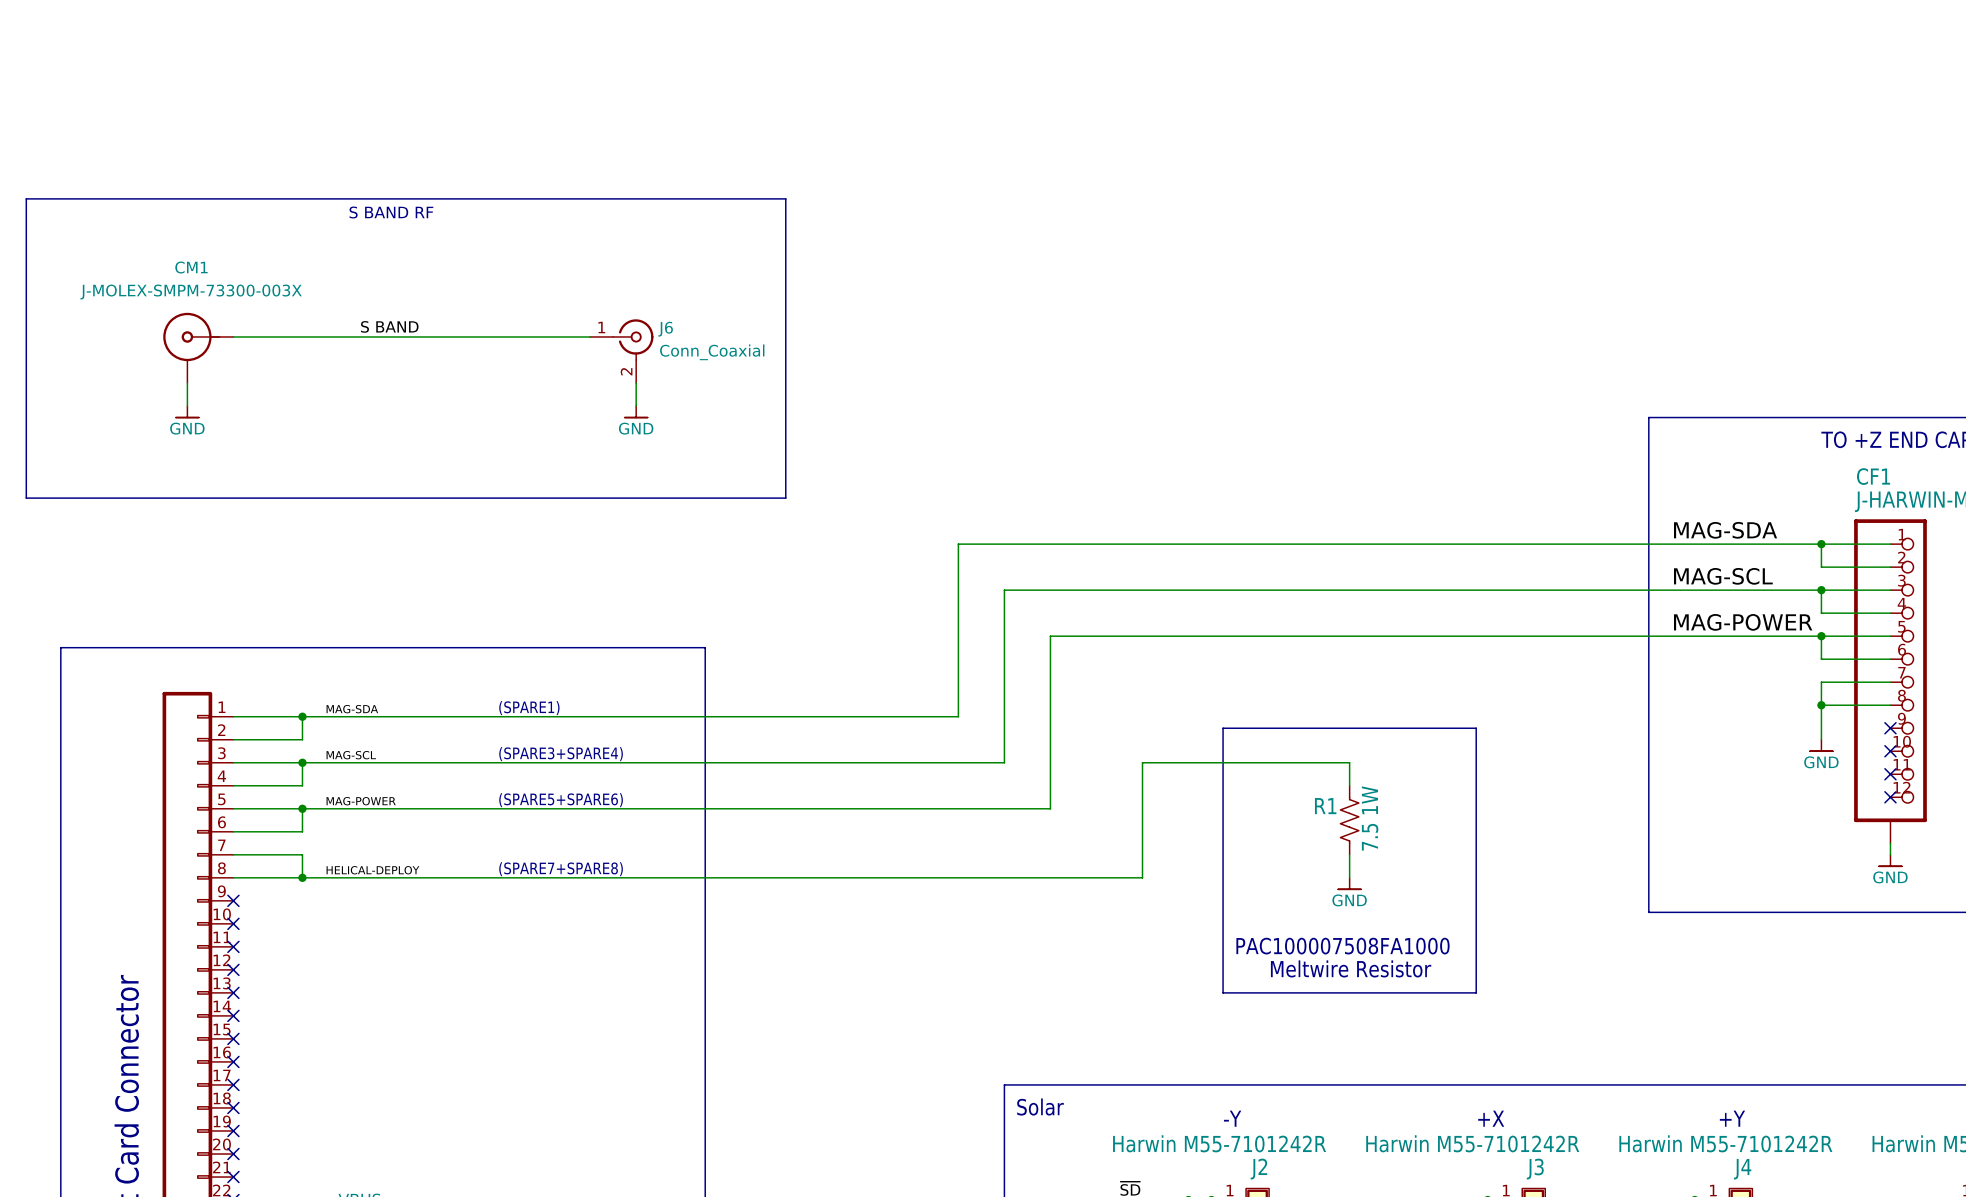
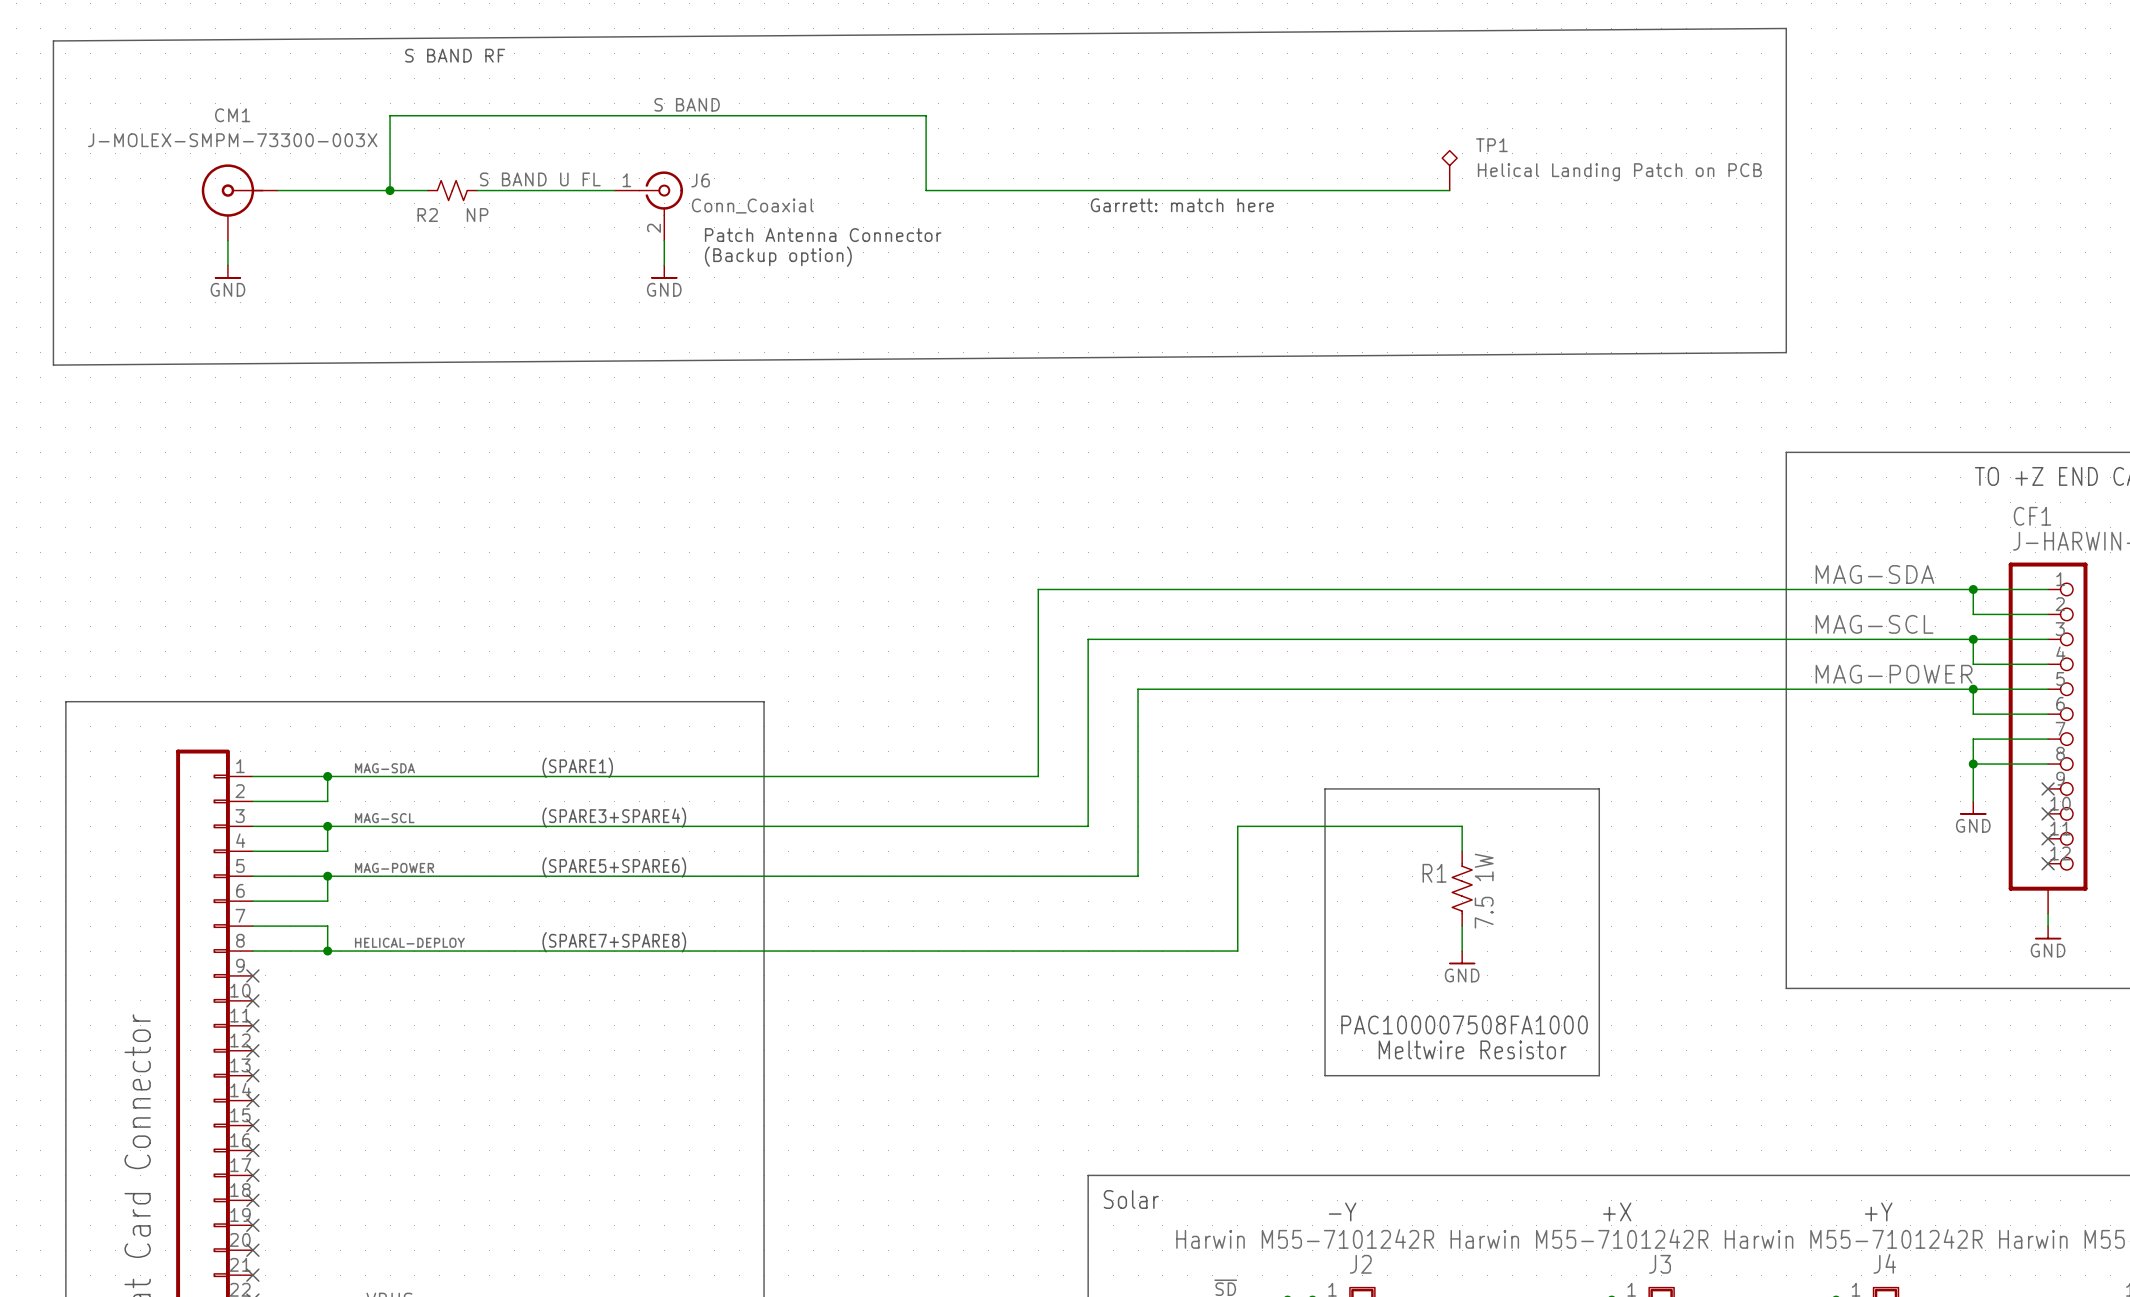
line: none -> (1786, 28) (1786, 352) (53, 365) (53, 40) (1786, 28)
label: none -> S BAND (687, 104)
TP1: none -> Helical Landing Patch on PCB (1449, 170)
label: none -> S BAND U FL (540, 179)
wire: none -> (277, 190) (427, 190)
wire: none -> (390, 190) (390, 115) (926, 115) (926, 190) (1449, 190)
junction: none -> (390, 190)
R2: none -> NP (452, 190)
wire: none -> (477, 190) (614, 190)
text: none -> Garrett: match here (1182, 205)
line: (26, 198) (26, 498) (785, 498) (785, 198) (26, 198) -> none
text position: S BAND RF (391, 212) -> S BAND RF (455, 55)
text: none -> Patch Antenna Connector (823, 235)
text: none -> (Backup option) (778, 256)
label: S BAND (389, 326) -> none
wire: (233, 336) (590, 336) -> none
CM1 position: (198, 347) -> (239, 202)
J6 position: (621, 351) -> (648, 205)
wire: (187, 383) (187, 406) -> (227, 240) (227, 265)
wire: (636, 383) (636, 406) -> (664, 240) (664, 265)
power symbol position: GND (187, 411) -> GND (227, 271)
power symbol position: GND (636, 411) -> GND (664, 271)

